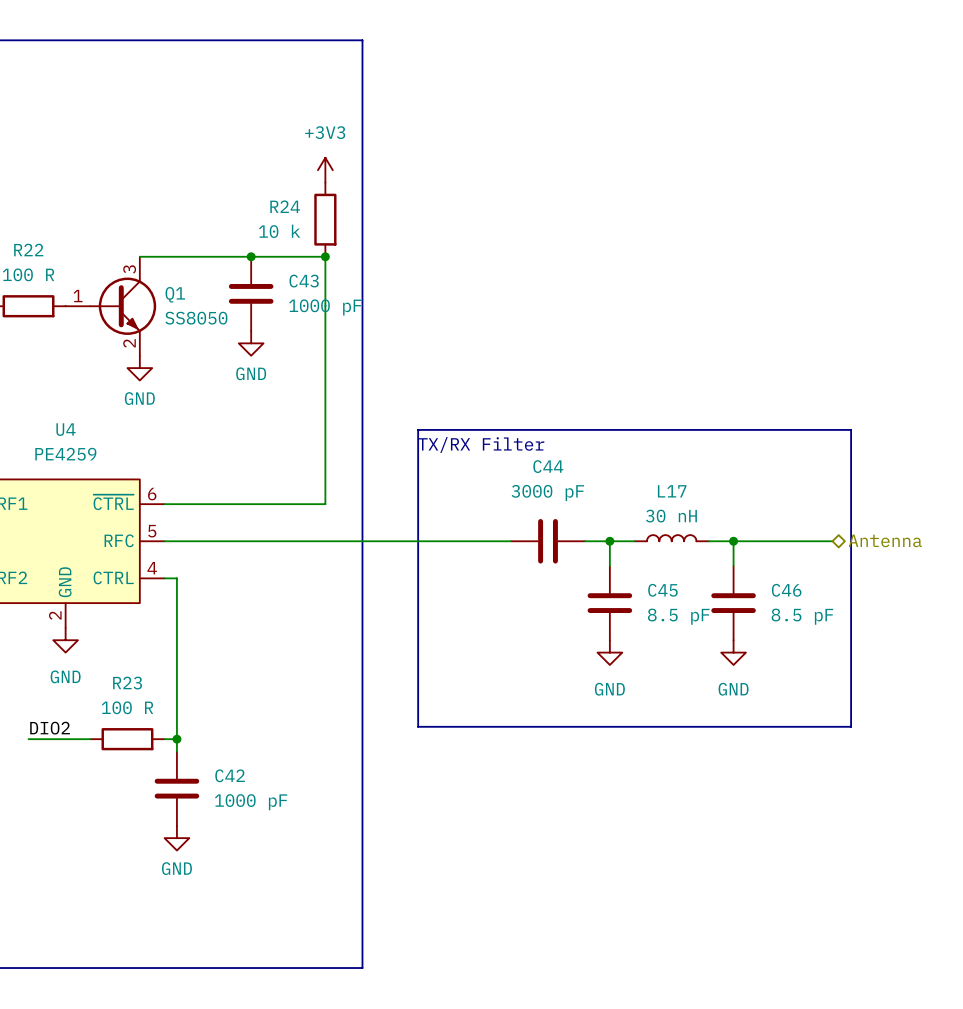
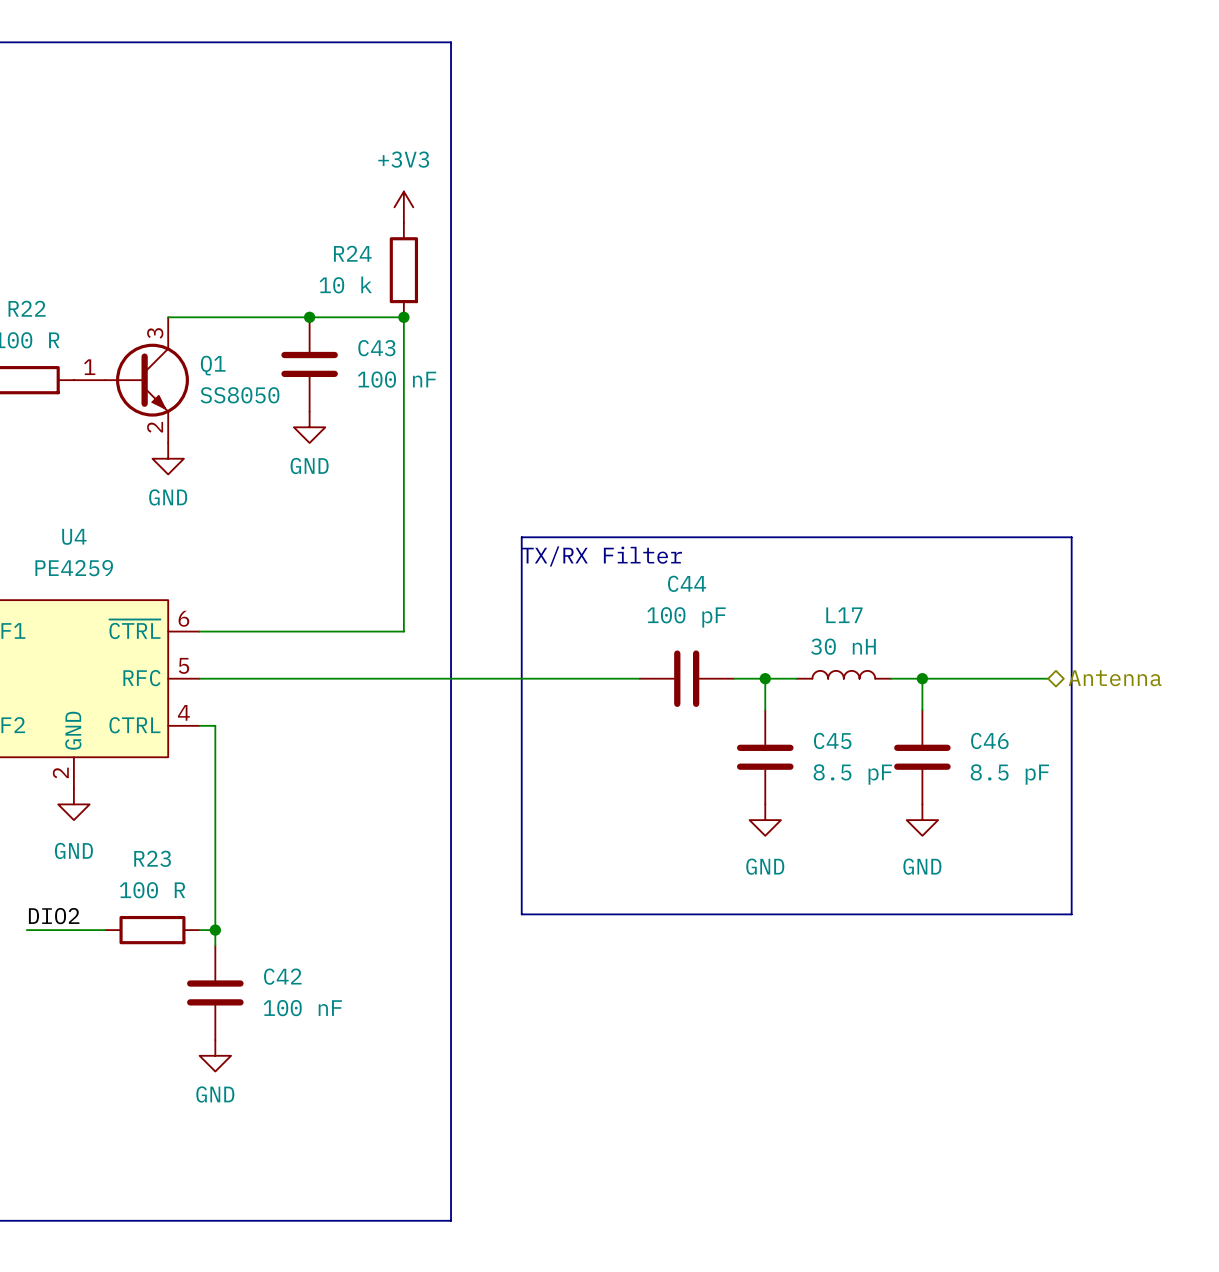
C43 value: 1000 pF (325, 307) -> 100 nF (397, 379)
C44 value: 3000 pF (547, 492) -> 100 pF (686, 617)
C42 value: 1000 pF (251, 802) -> 100 nF (302, 1008)

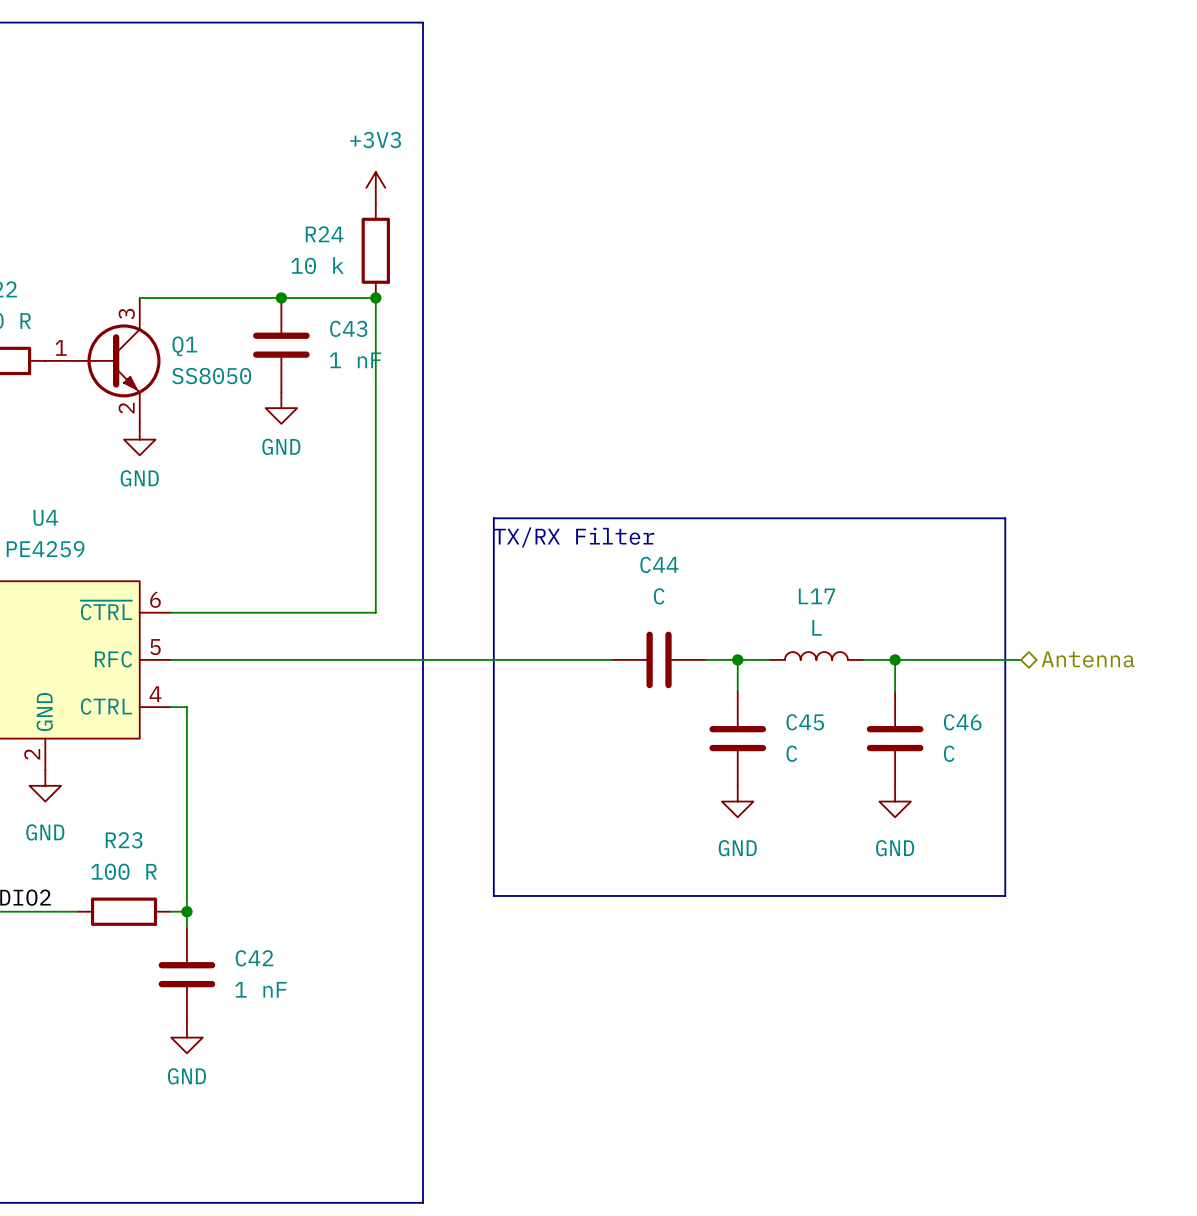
C43 value: 100 nF (397, 379) -> 1 nF (355, 360)
line: (1032, 537) (1071, 537) (1071, 914) (1032, 914) -> (1005, 518) (1005, 895)
C44 value: 100 pF (686, 617) -> C (659, 596)
L17 value: 30 nH (843, 646) -> L (817, 627)
C45 value: 8.5 pF (852, 774) -> C (791, 753)
C46 value: 8.5 pF (1009, 774) -> C (949, 753)
C42 value: 100 nF (302, 1008) -> 1 nF (261, 989)

